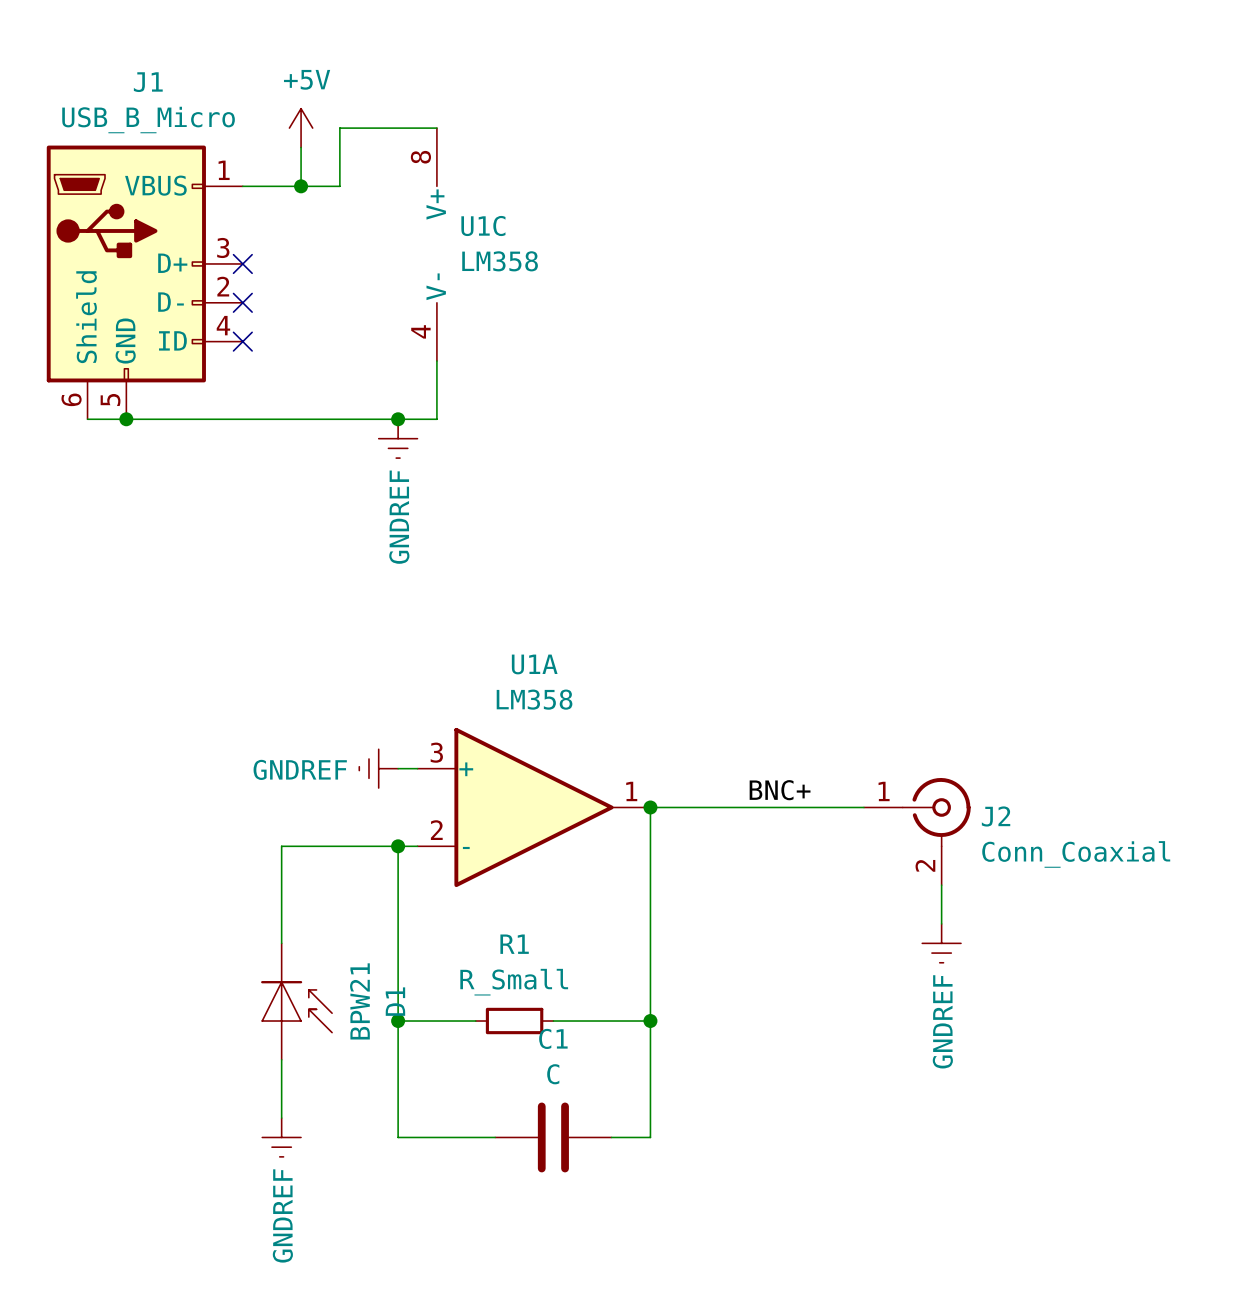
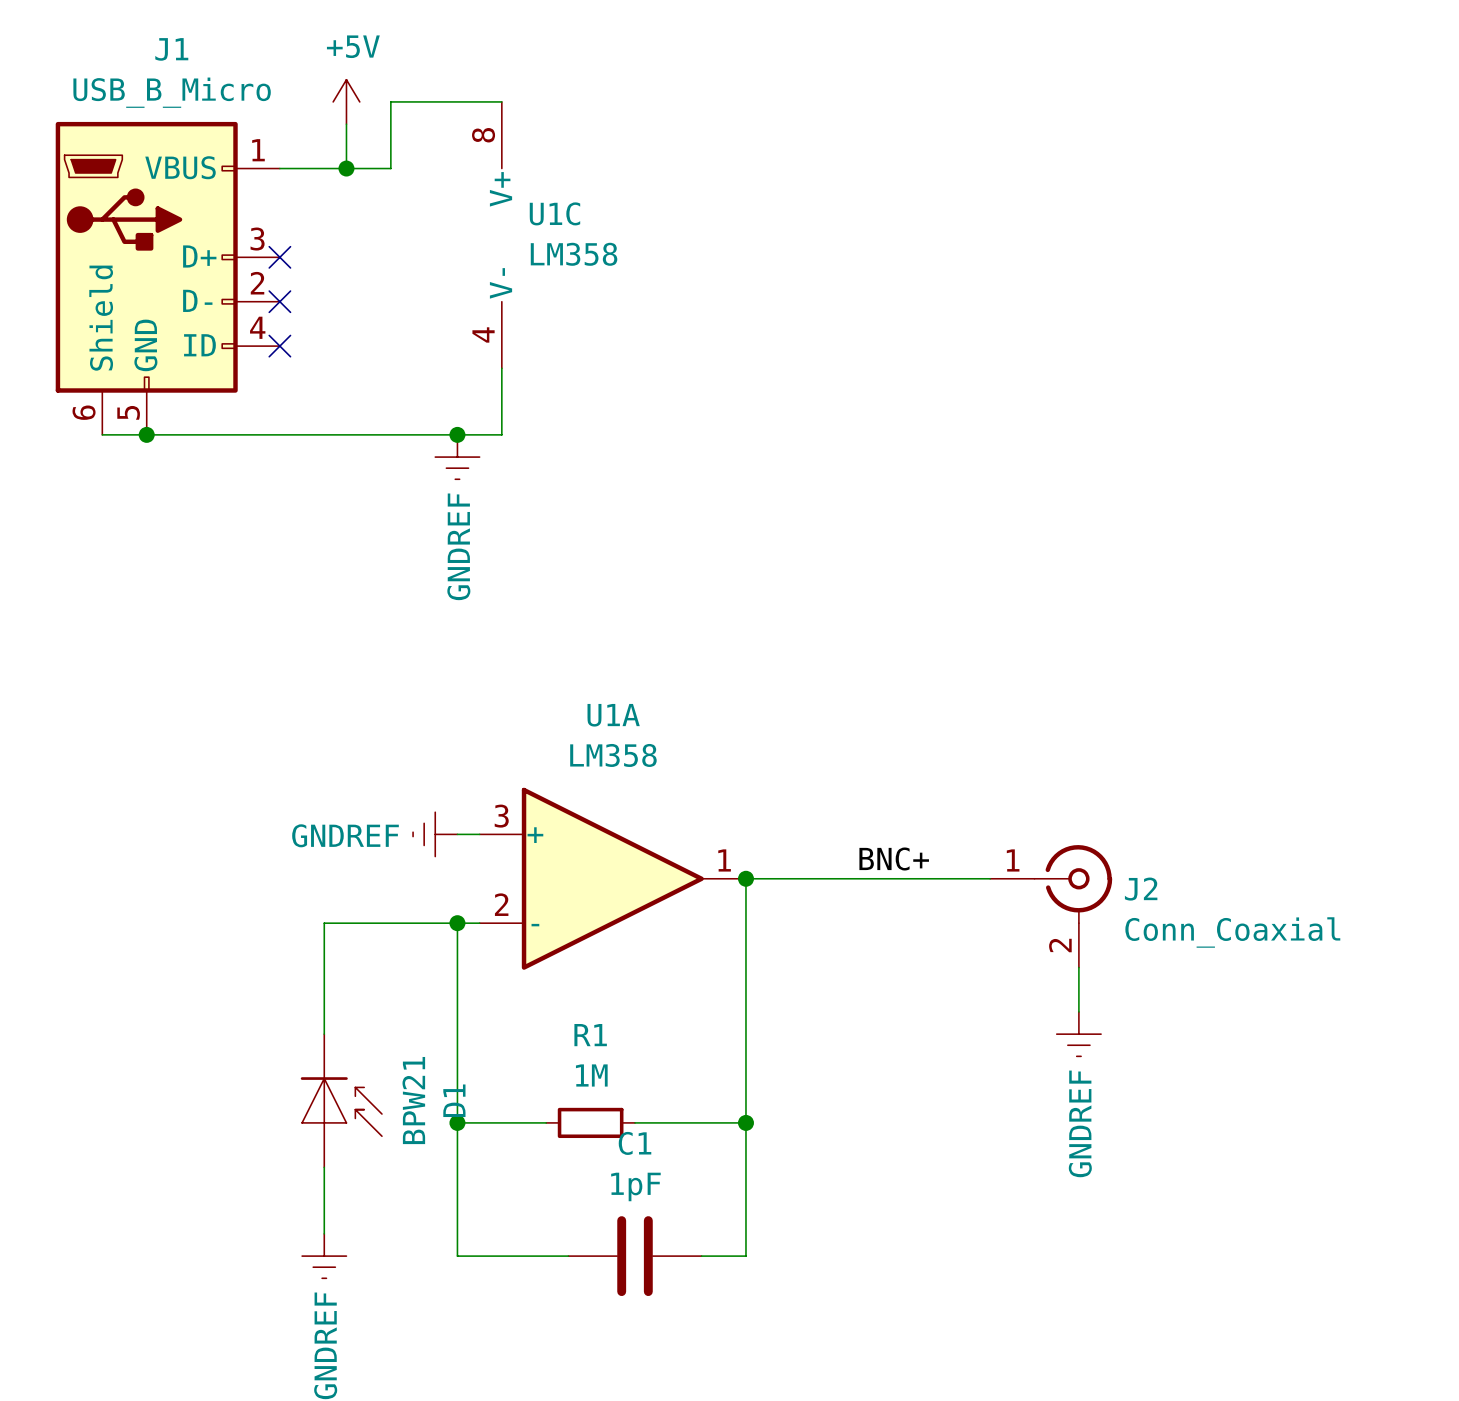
R1 value: R_Small (514, 982) -> 1M (591, 1075)
C1 value: C (553, 1074) -> 1pF (635, 1186)

